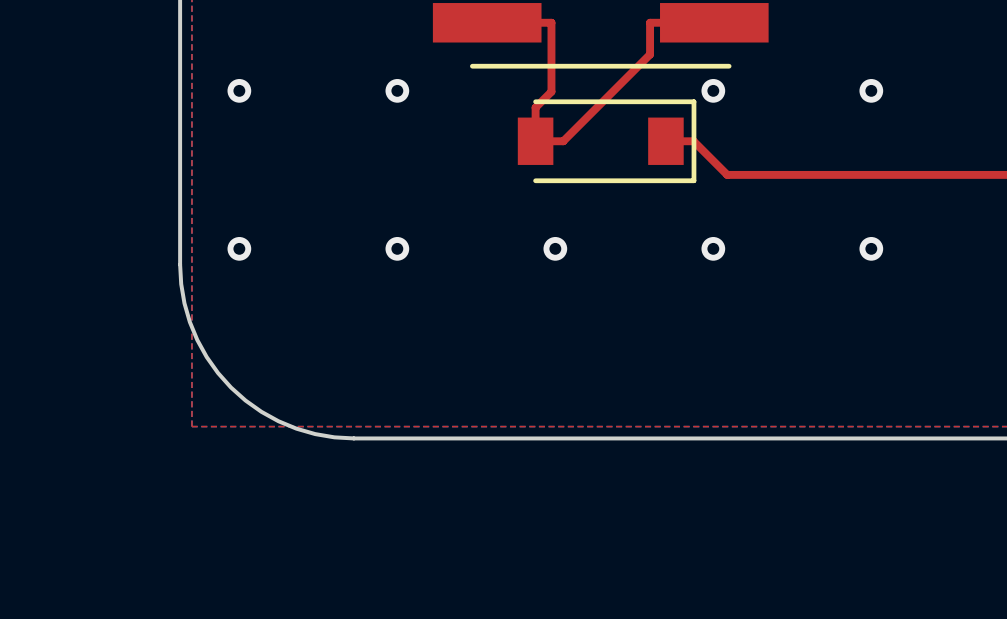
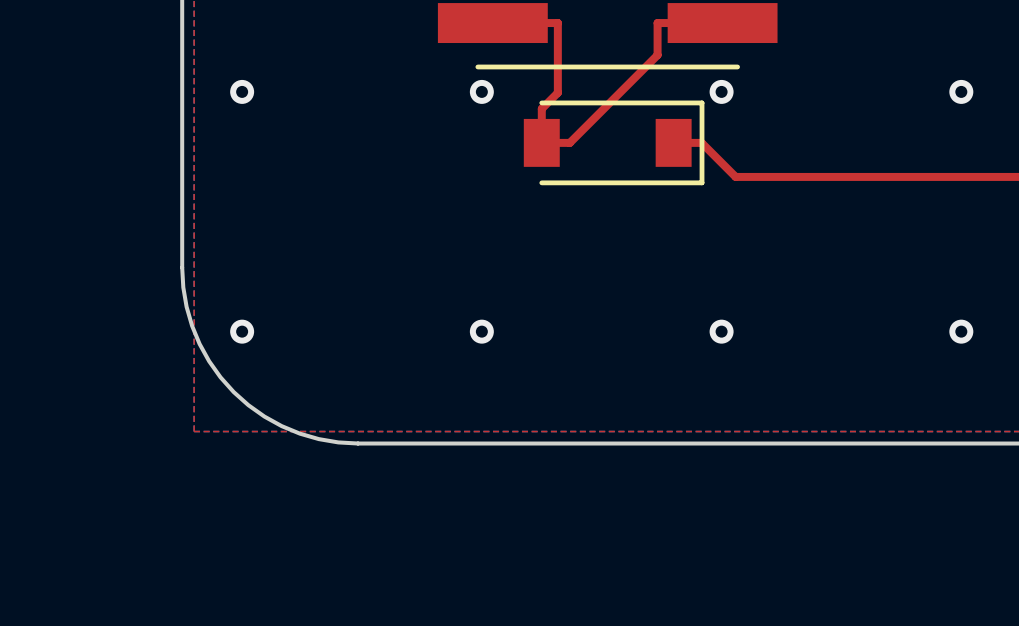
via position: (397, 90) -> (481, 91)
via: (871, 90) -> none
via: none -> (961, 91)
via position: (239, 248) -> (242, 331)
via: (397, 248) -> none
via: (555, 248) -> none
via position: (713, 248) -> (721, 331)
via: (871, 248) -> none
via: none -> (481, 331)
via: none -> (961, 331)

